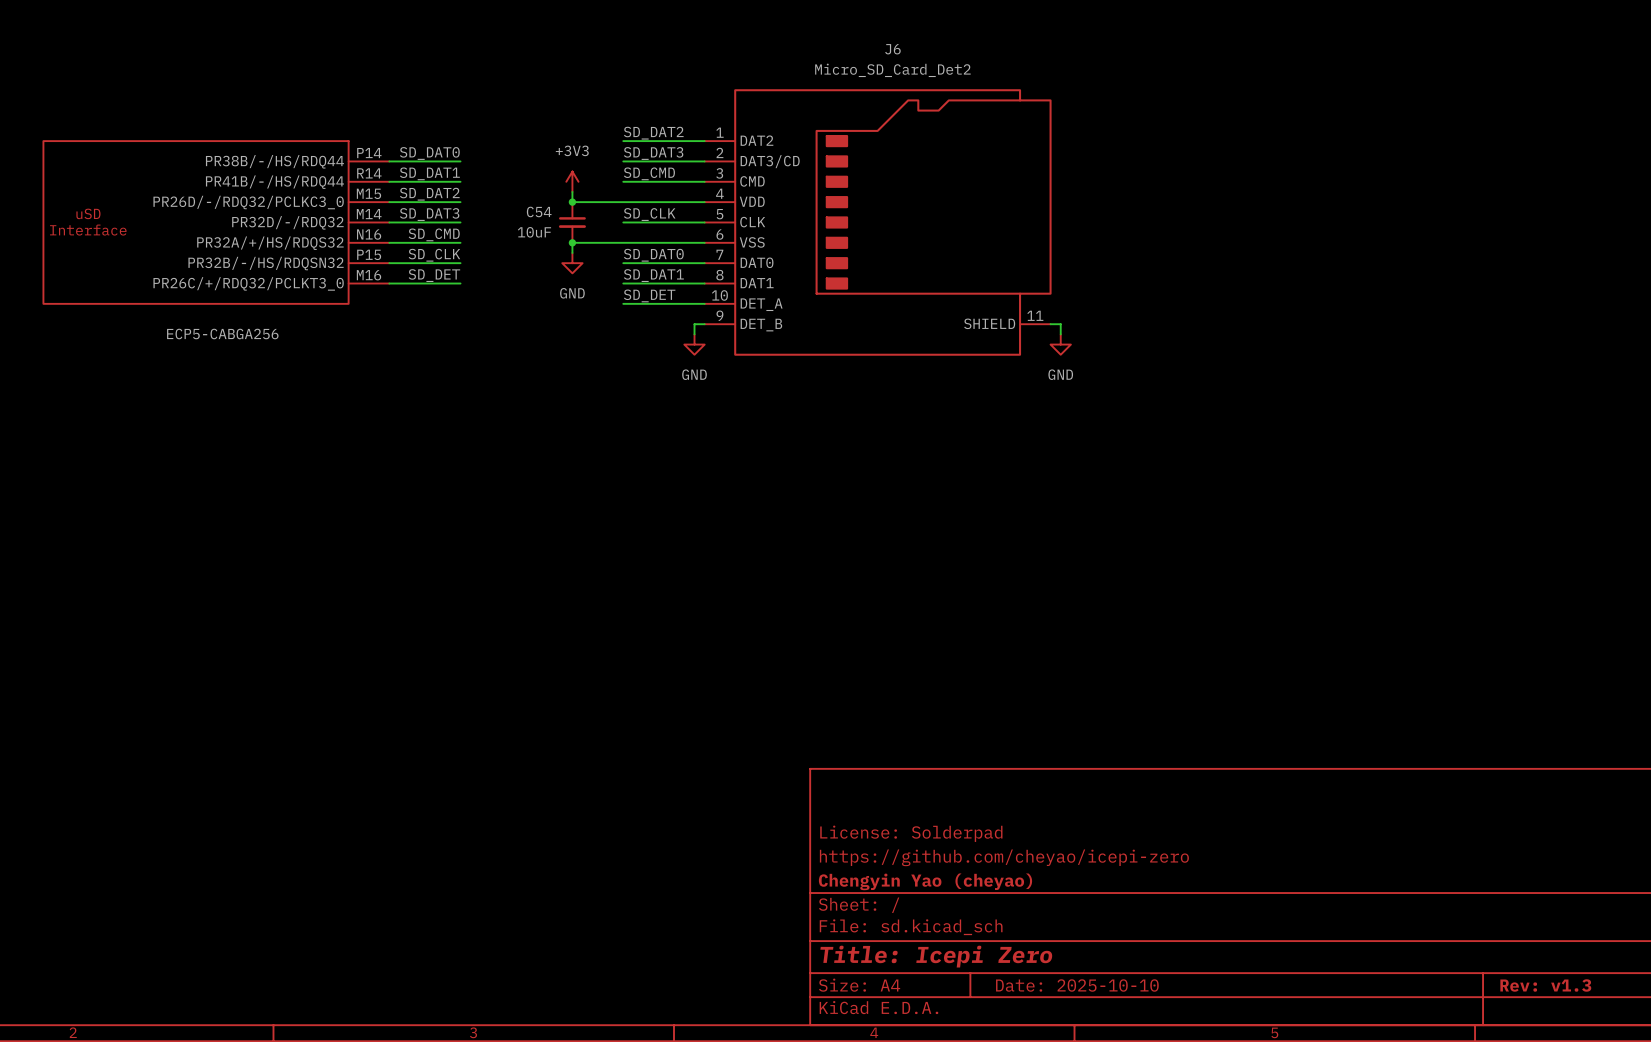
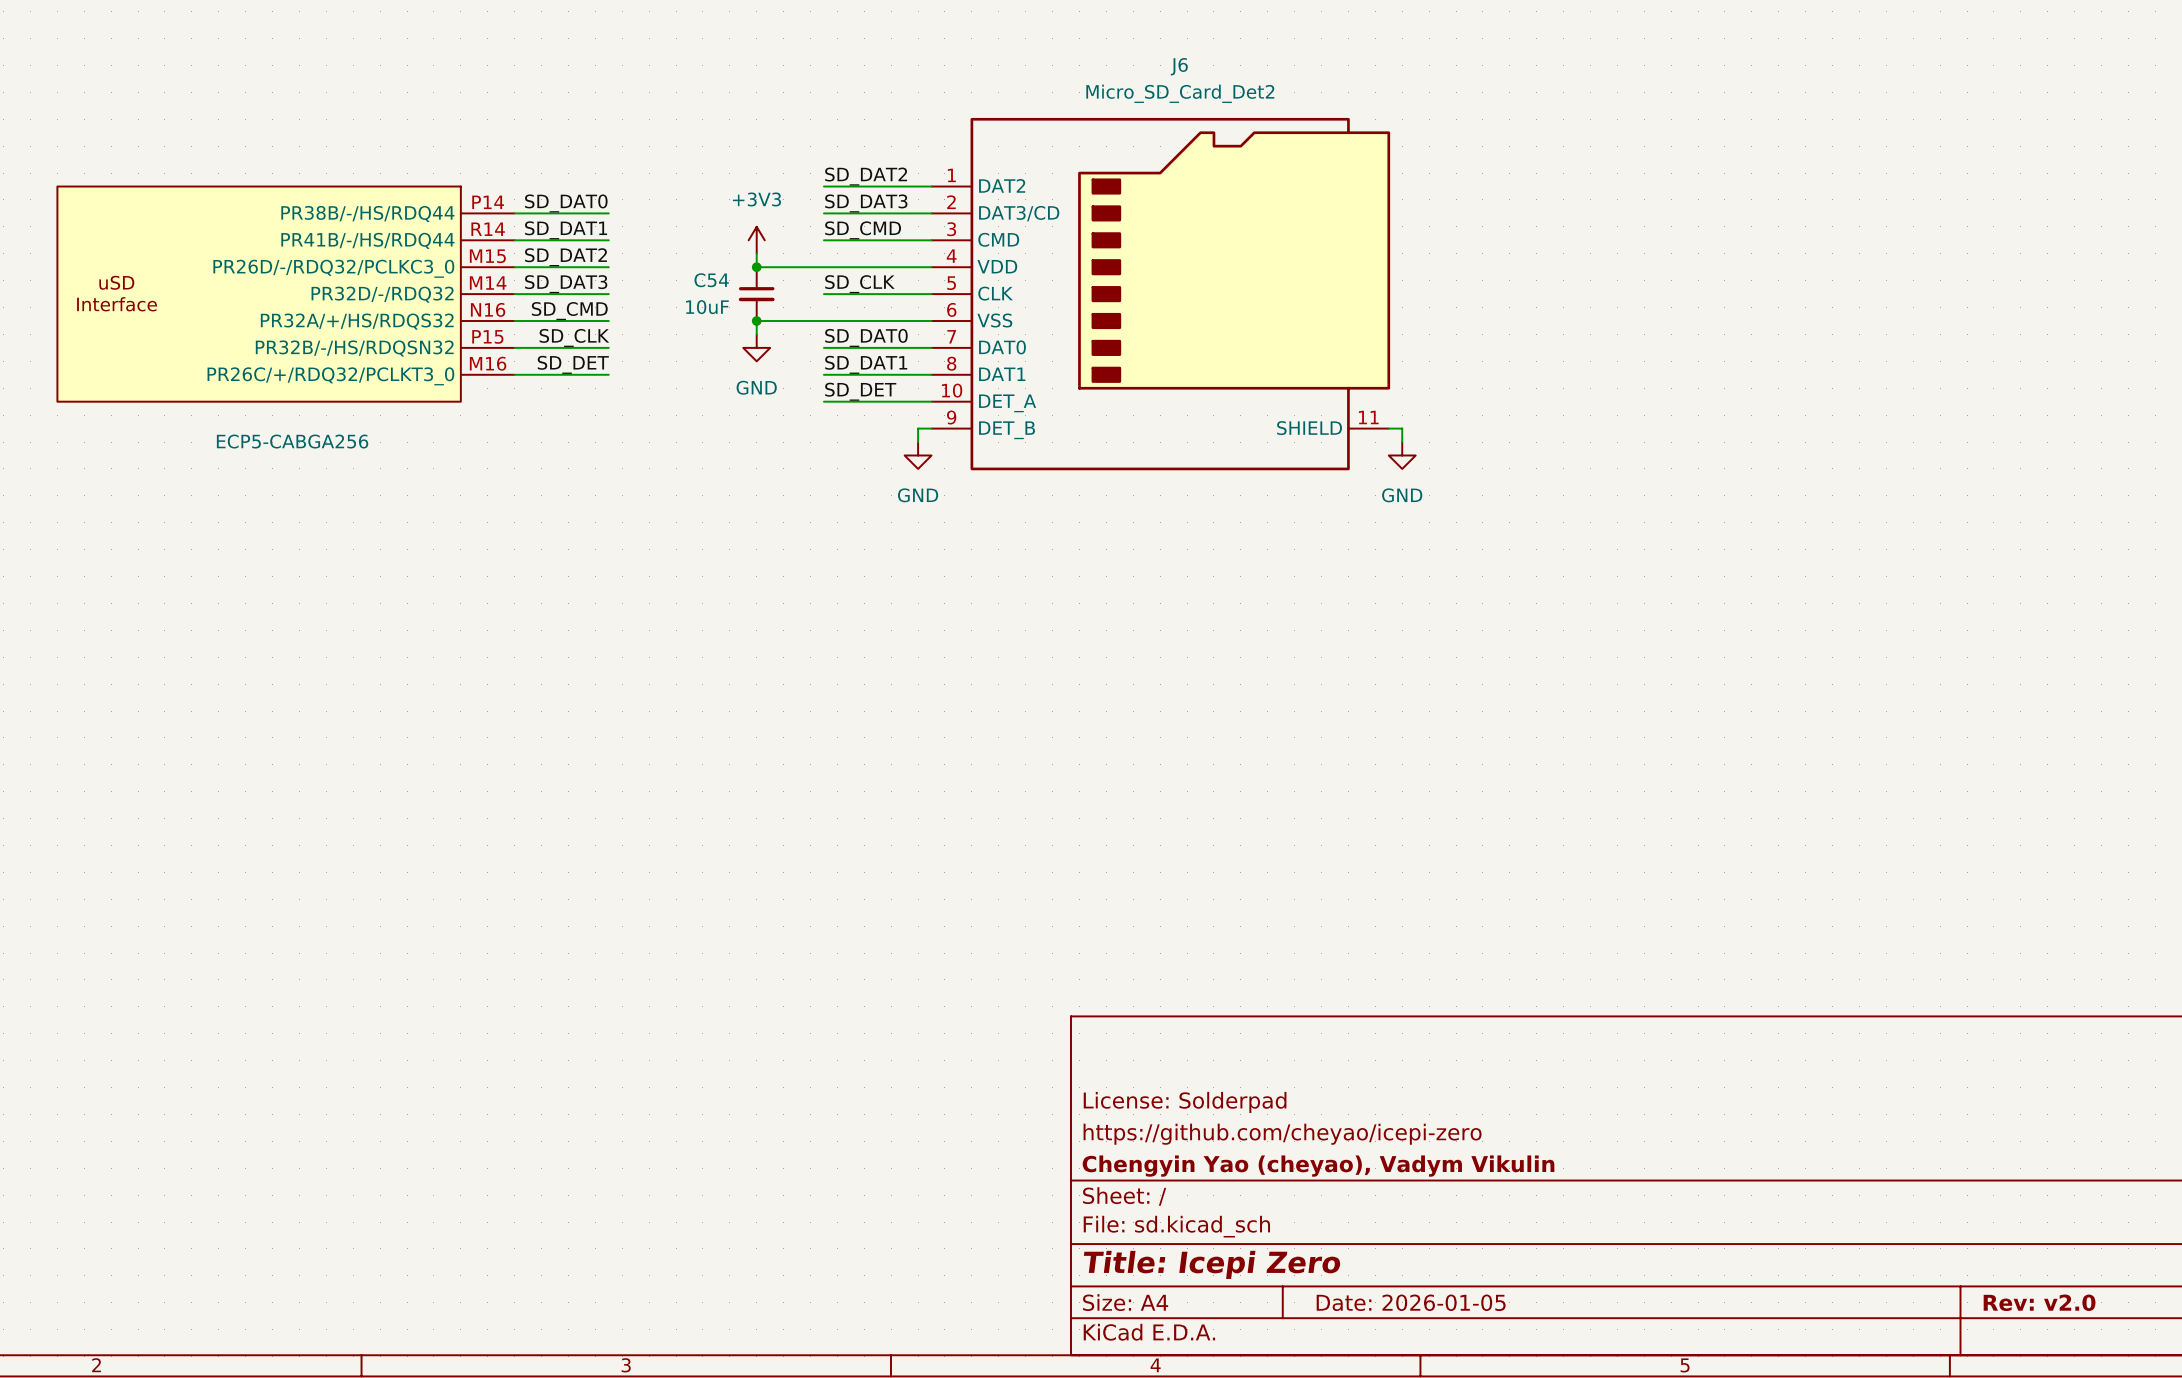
title block: Chengyin Yao (cheyao) (925, 881) -> Chengyin Yao (cheyao), Vadym Vikulin (1318, 1166)
title block: Date: 2025-10-10 (1077, 985) -> Date: 2026-01-05 (1411, 1302)
title block: Rev: v1.3 (1545, 985) -> Rev: v2.0 (2039, 1302)

